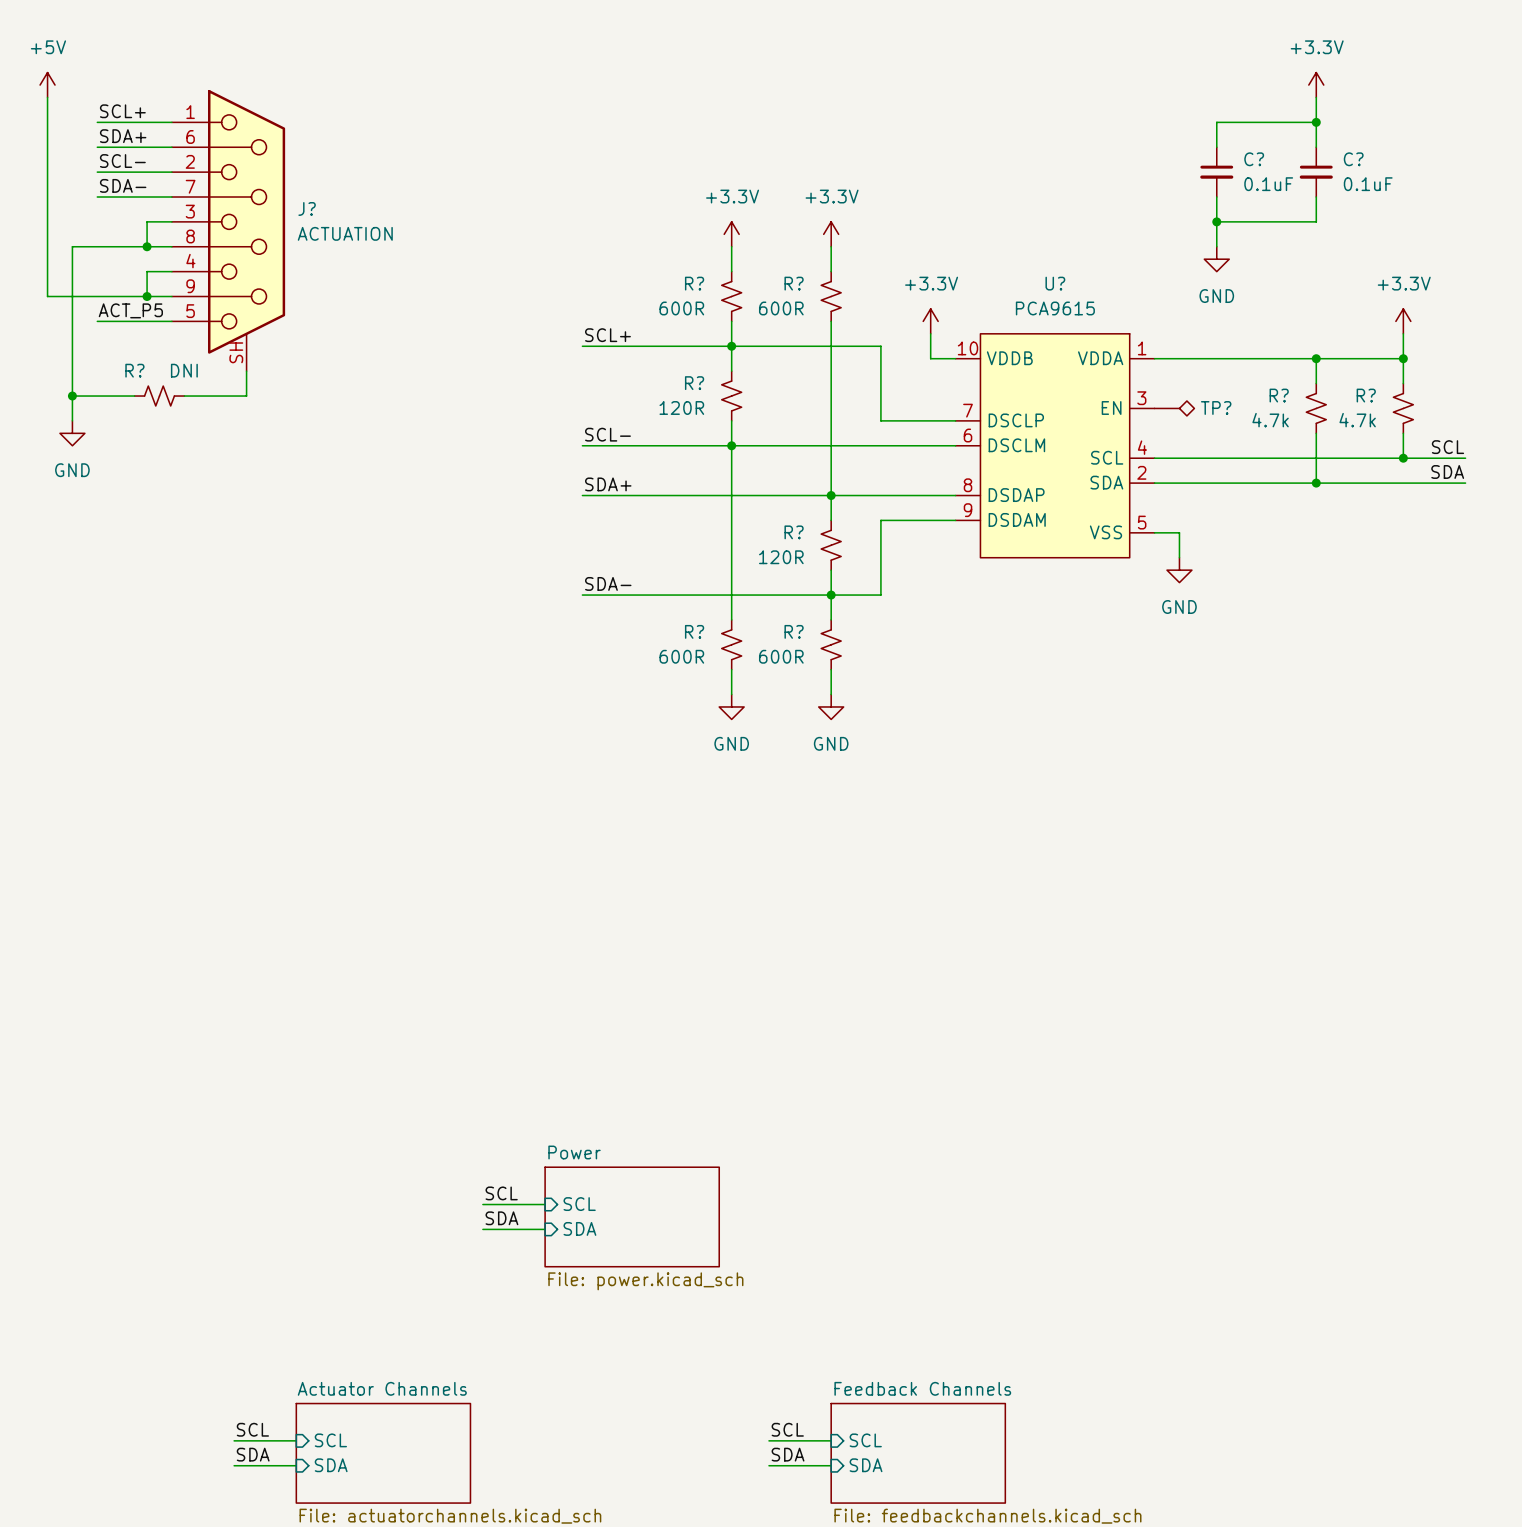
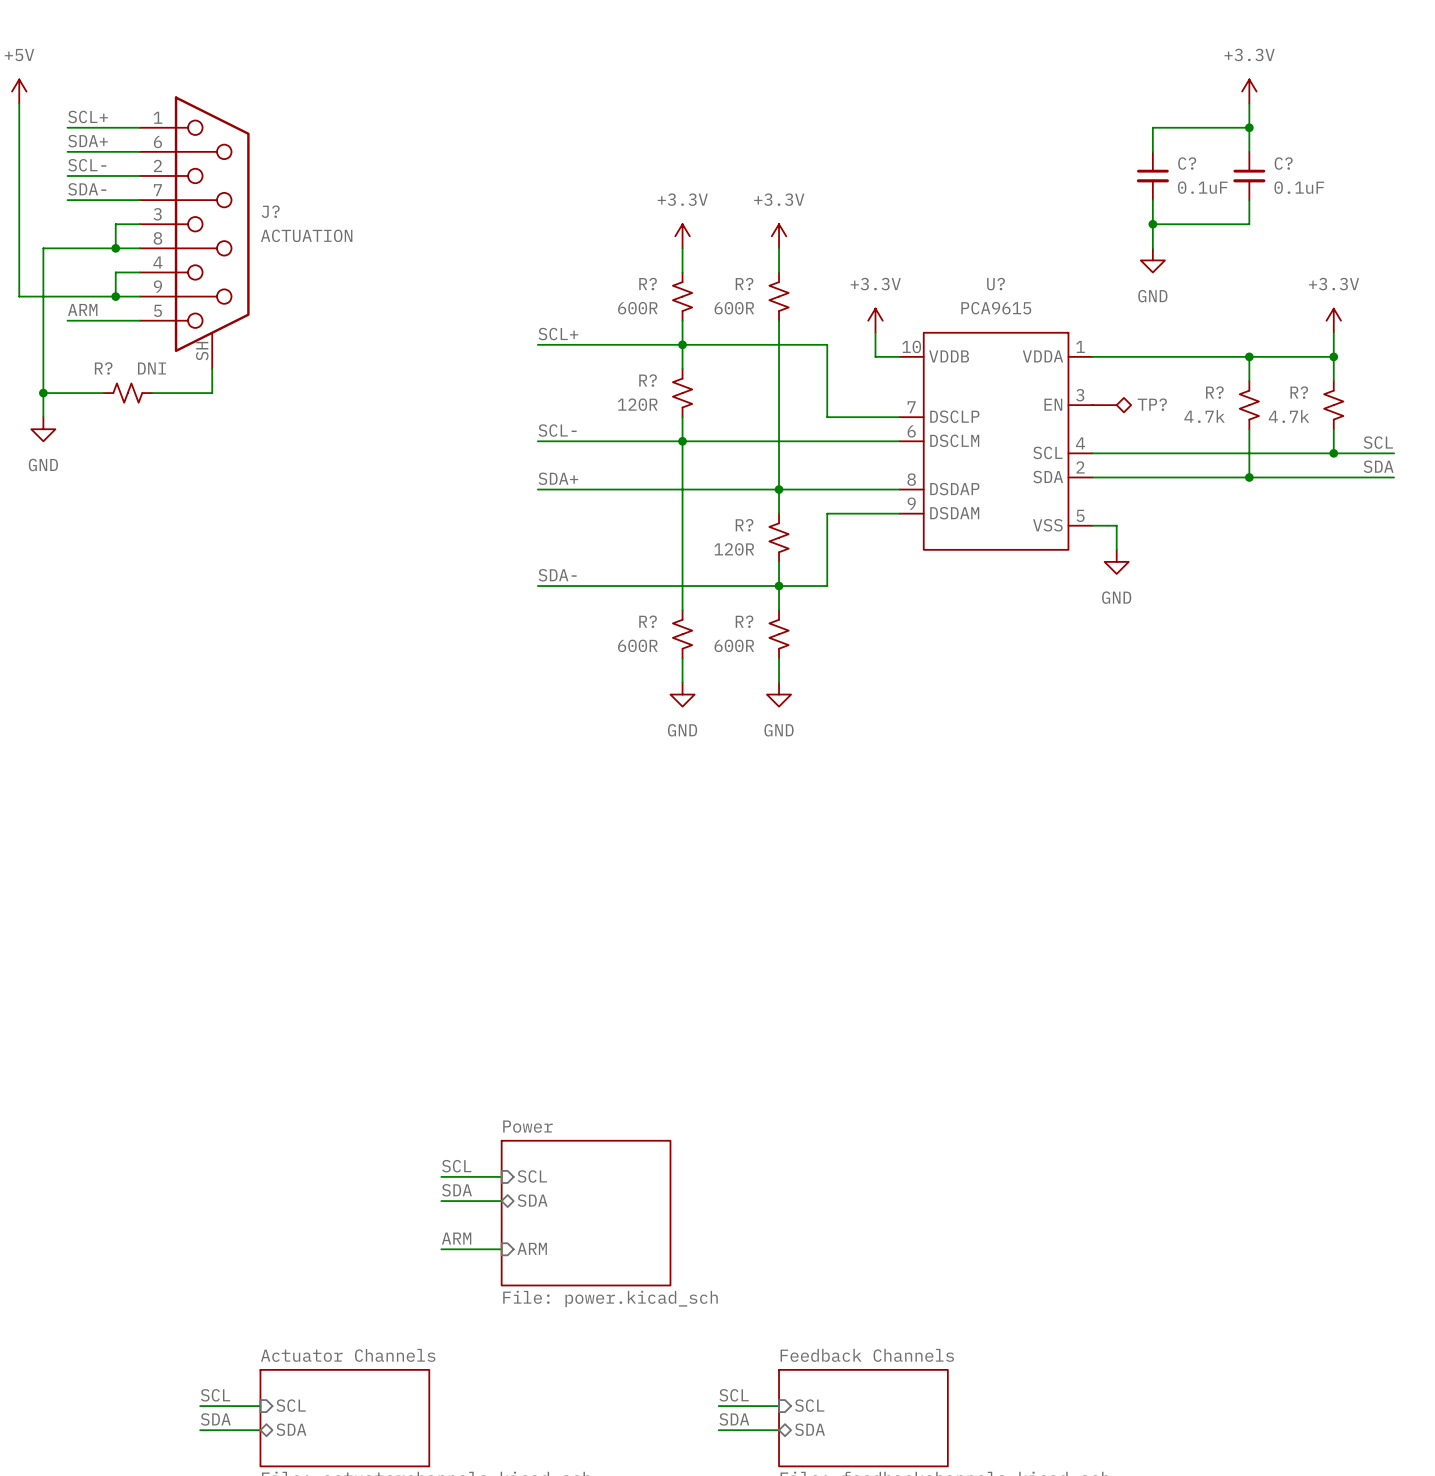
label: ACT_P5 (130, 310) -> ARM (82, 309)
sheet Power: File: power.kicad_sch (632, 1216) -> none
sheet pin shape: input (579, 1228) -> bidirectional (532, 1200)
sheet Power: none -> File: power.kicad_sch (586, 1213)
label: none -> ARM (456, 1238)
sheet pin: none -> ARM (532, 1248)
wire: none -> (441, 1249) (501, 1249)
sheet pin shape: input (331, 1465) -> bidirectional (291, 1429)
sheet pin shape: input (866, 1465) -> bidirectional (810, 1429)

